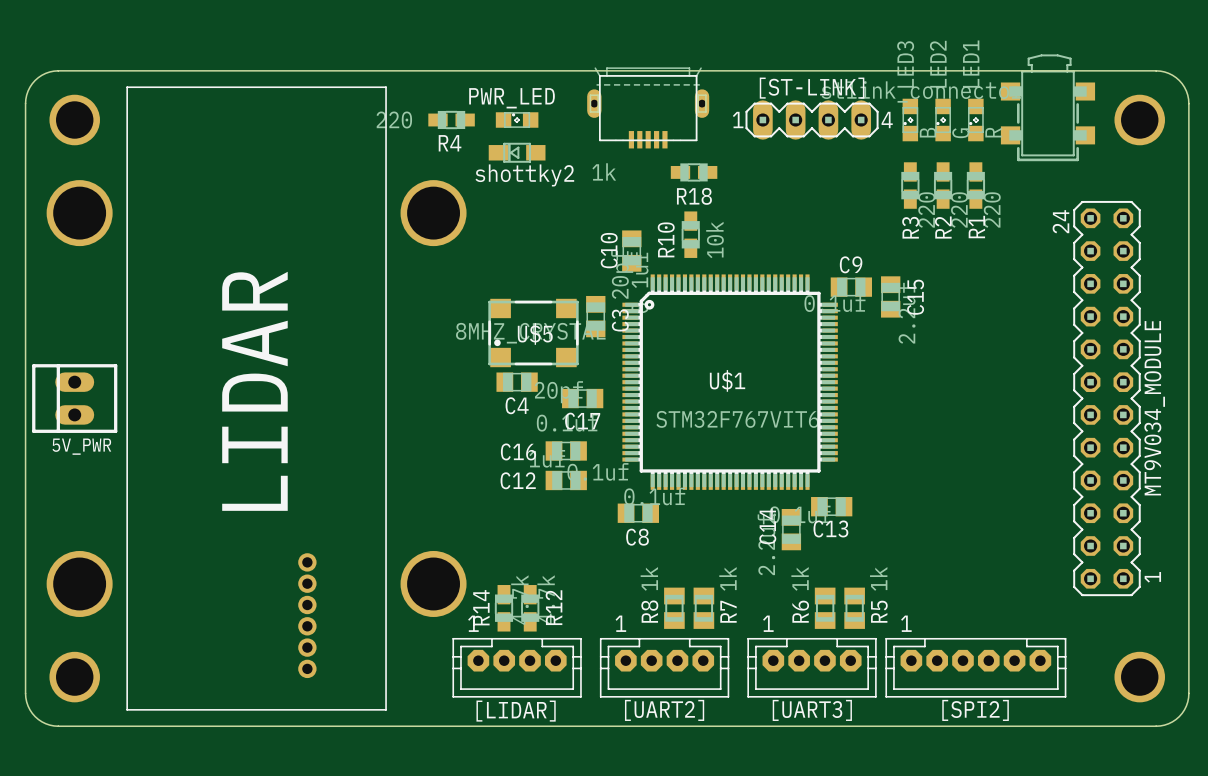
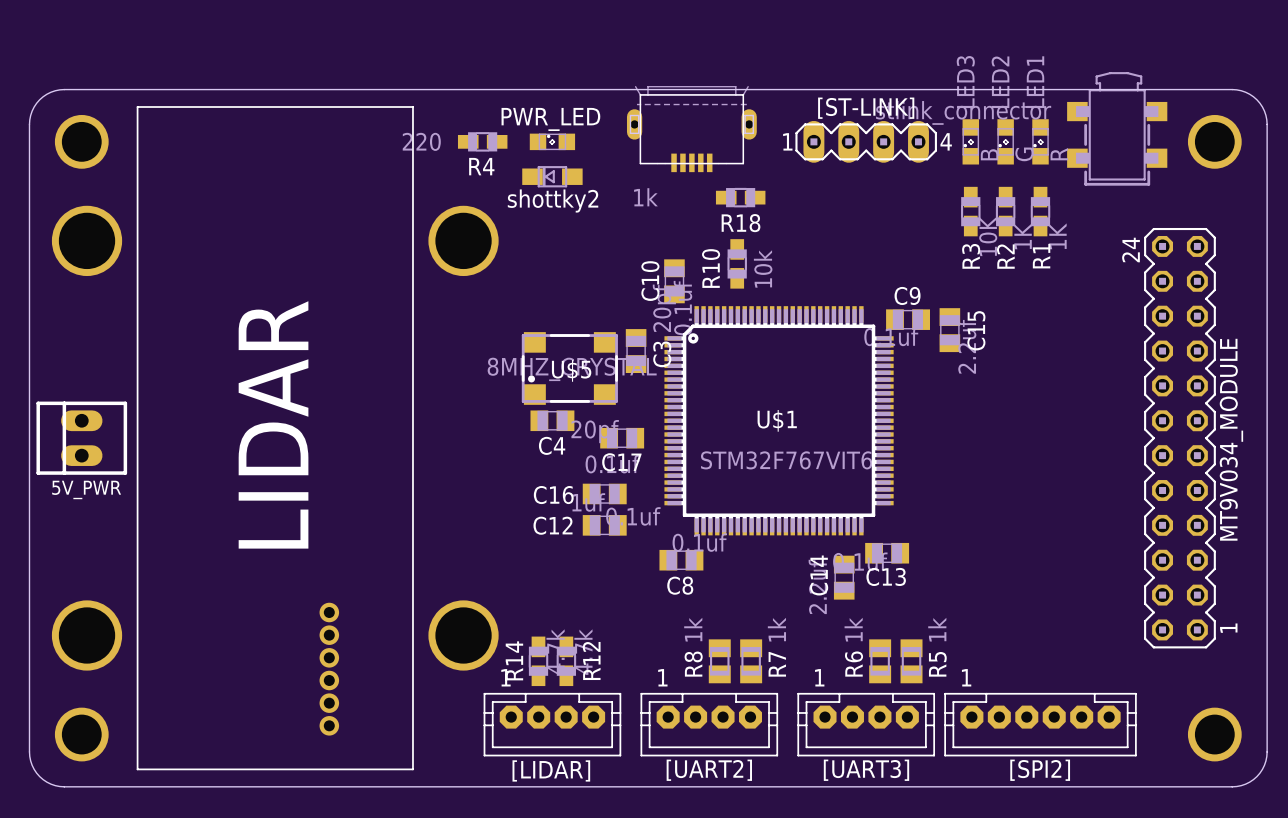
R3 value: 220 (926, 210) -> 10K (988, 236)
R2 value: 220 (959, 210) -> 1K (1023, 236)
R1 value: 220 (992, 210) -> 1K (1057, 236)

